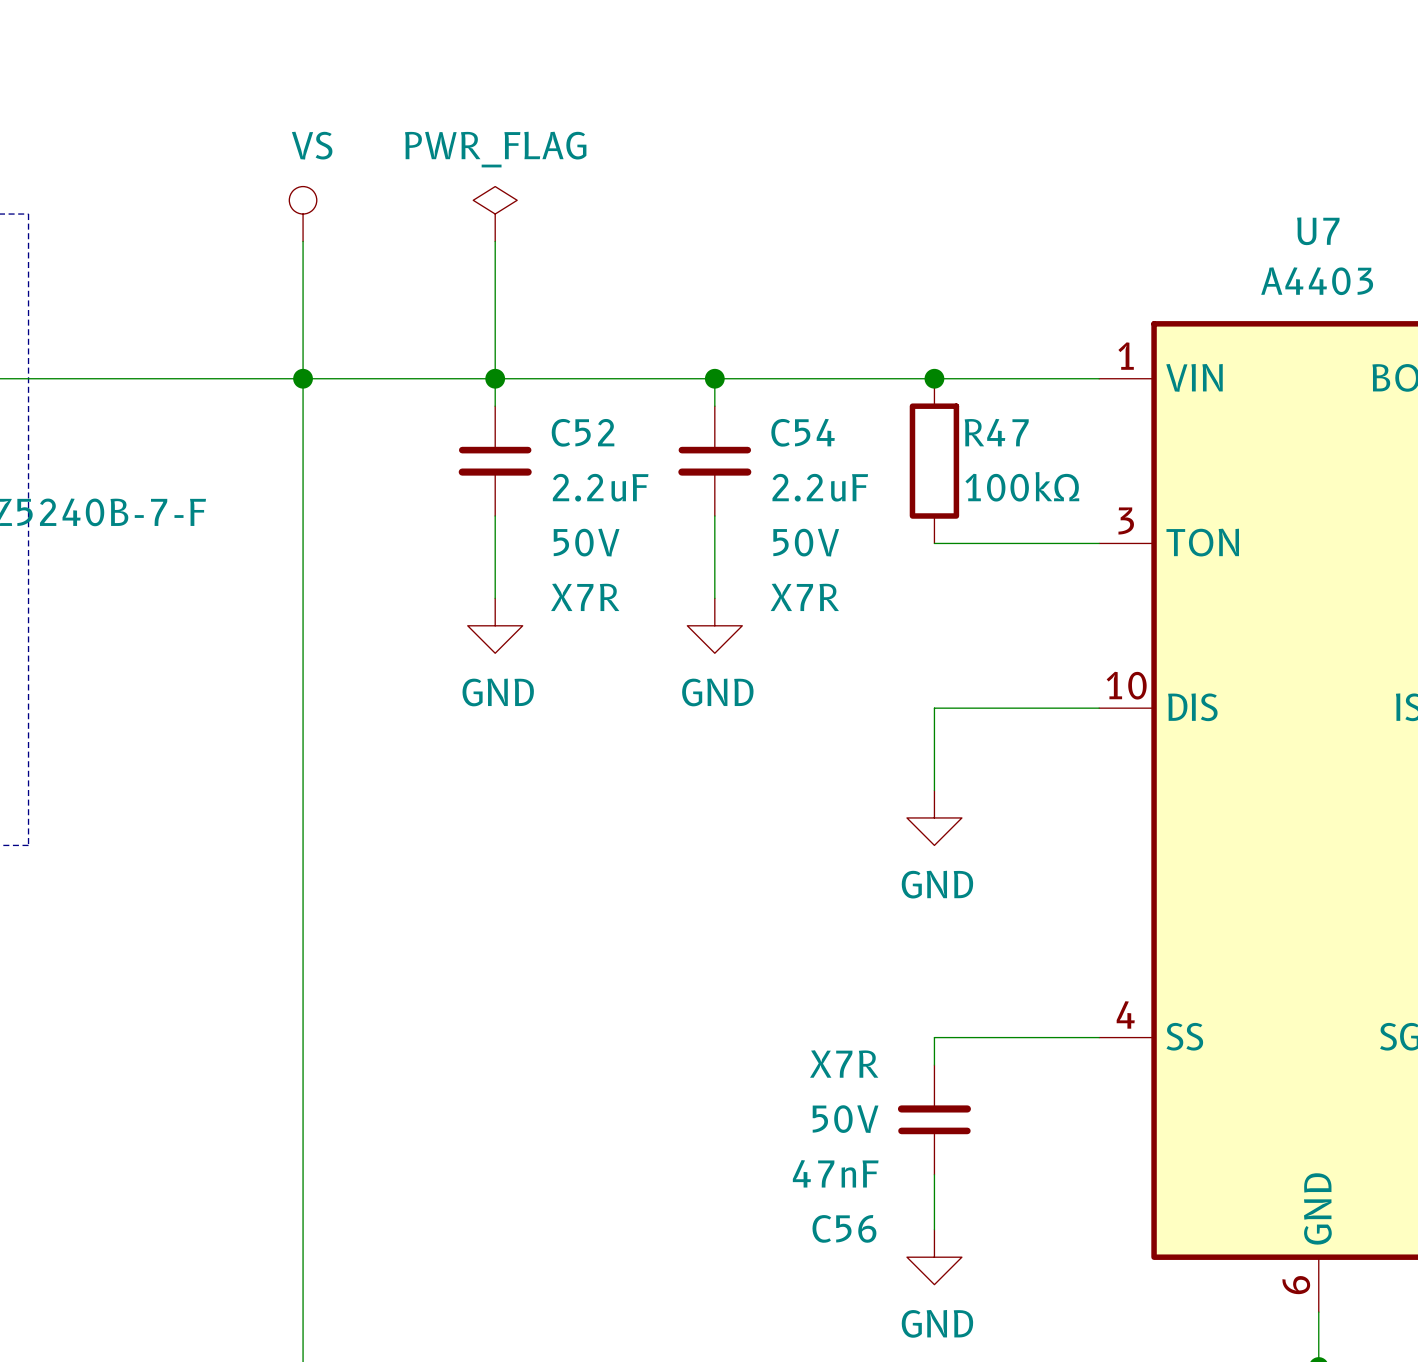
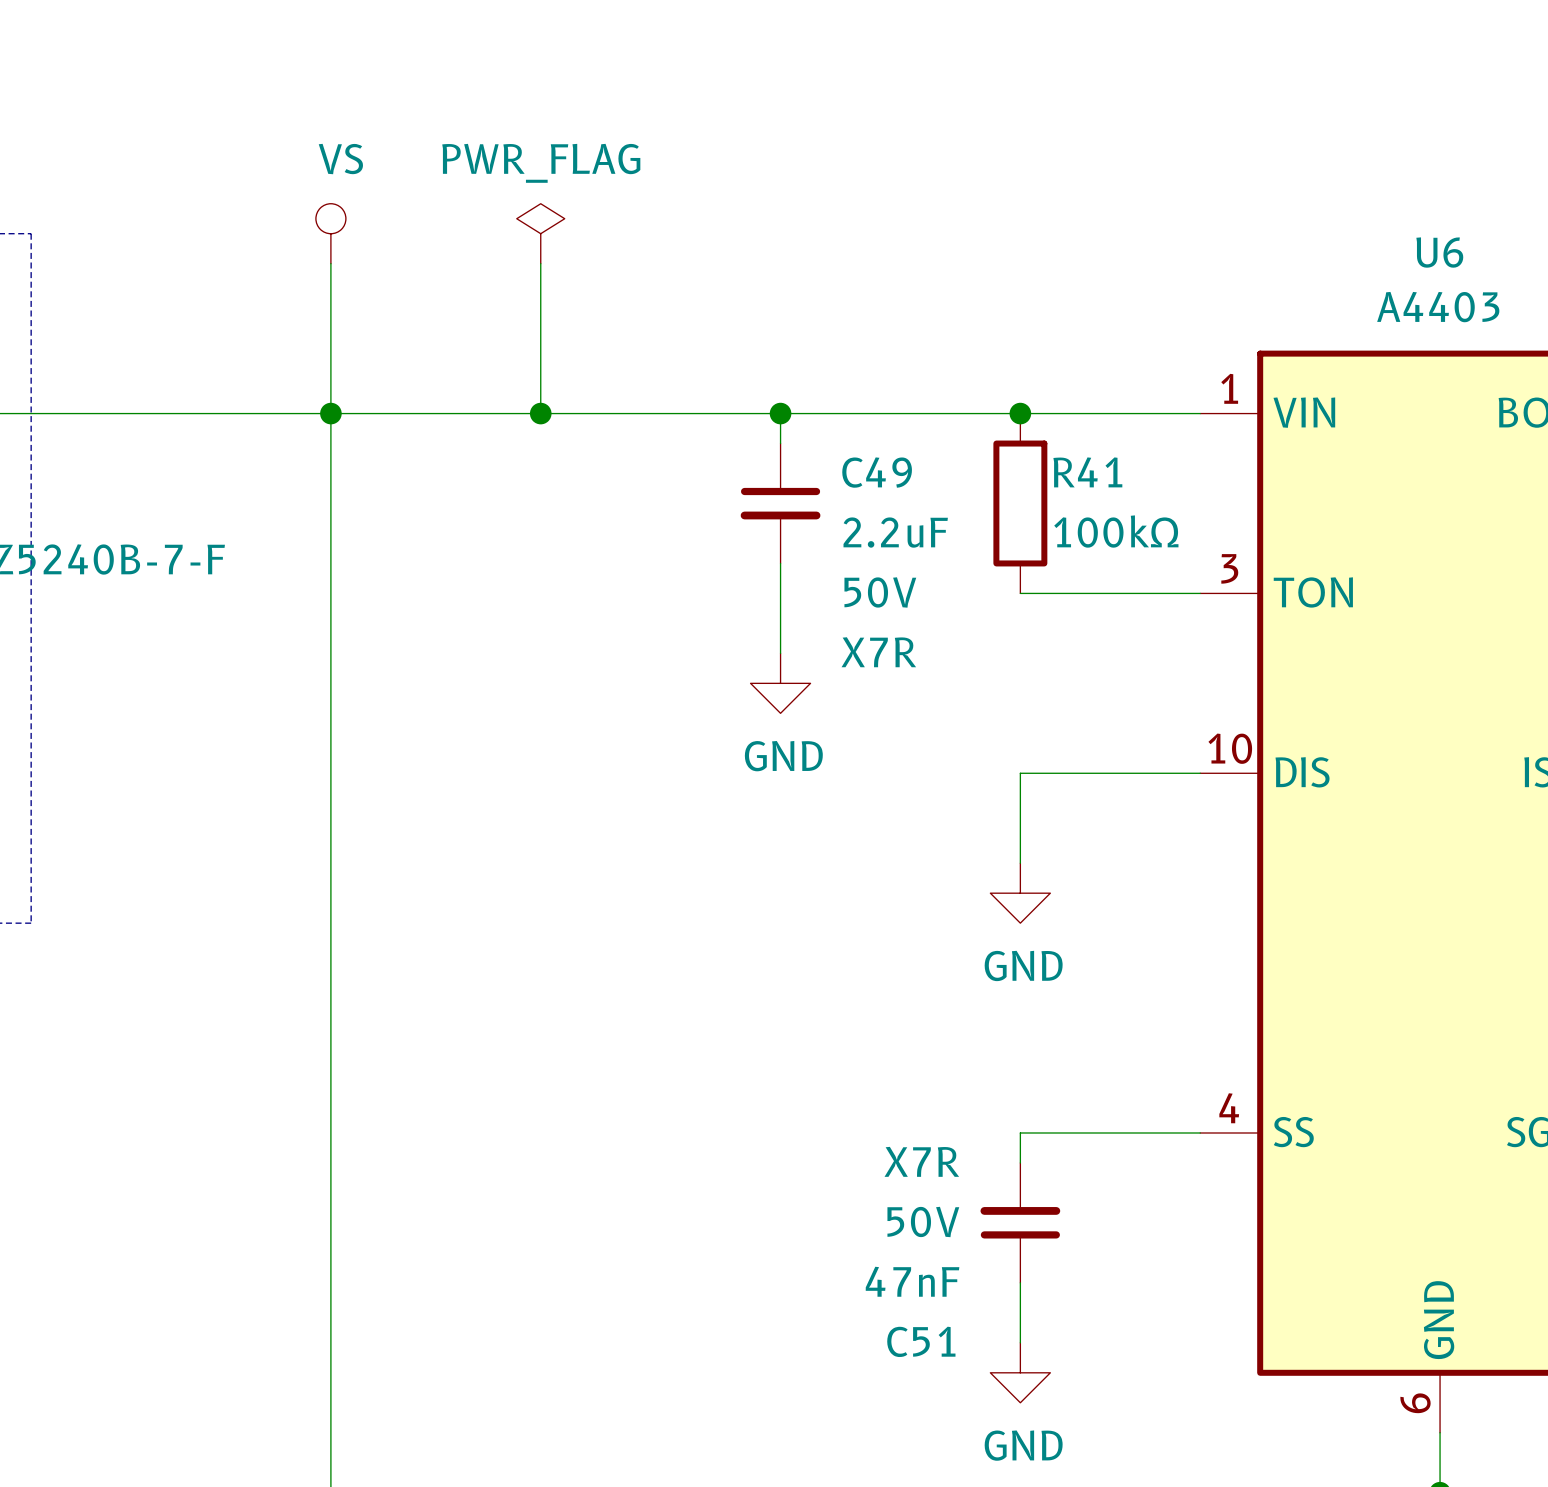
U7 name: U7 (1318, 231) -> U6 (1439, 252)
wire: (495, 378) (495, 406) -> none
C54 name: C54 (803, 432) -> C49 (877, 472)
R47 name: R47 (996, 432) -> R41 (1087, 472)
C52: 2.2uF (495, 461) -> none
wire: (495, 516) (495, 598) -> none
power symbol: GND (495, 625) -> none
C56 name: C56 (844, 1228) -> C51 (921, 1341)

